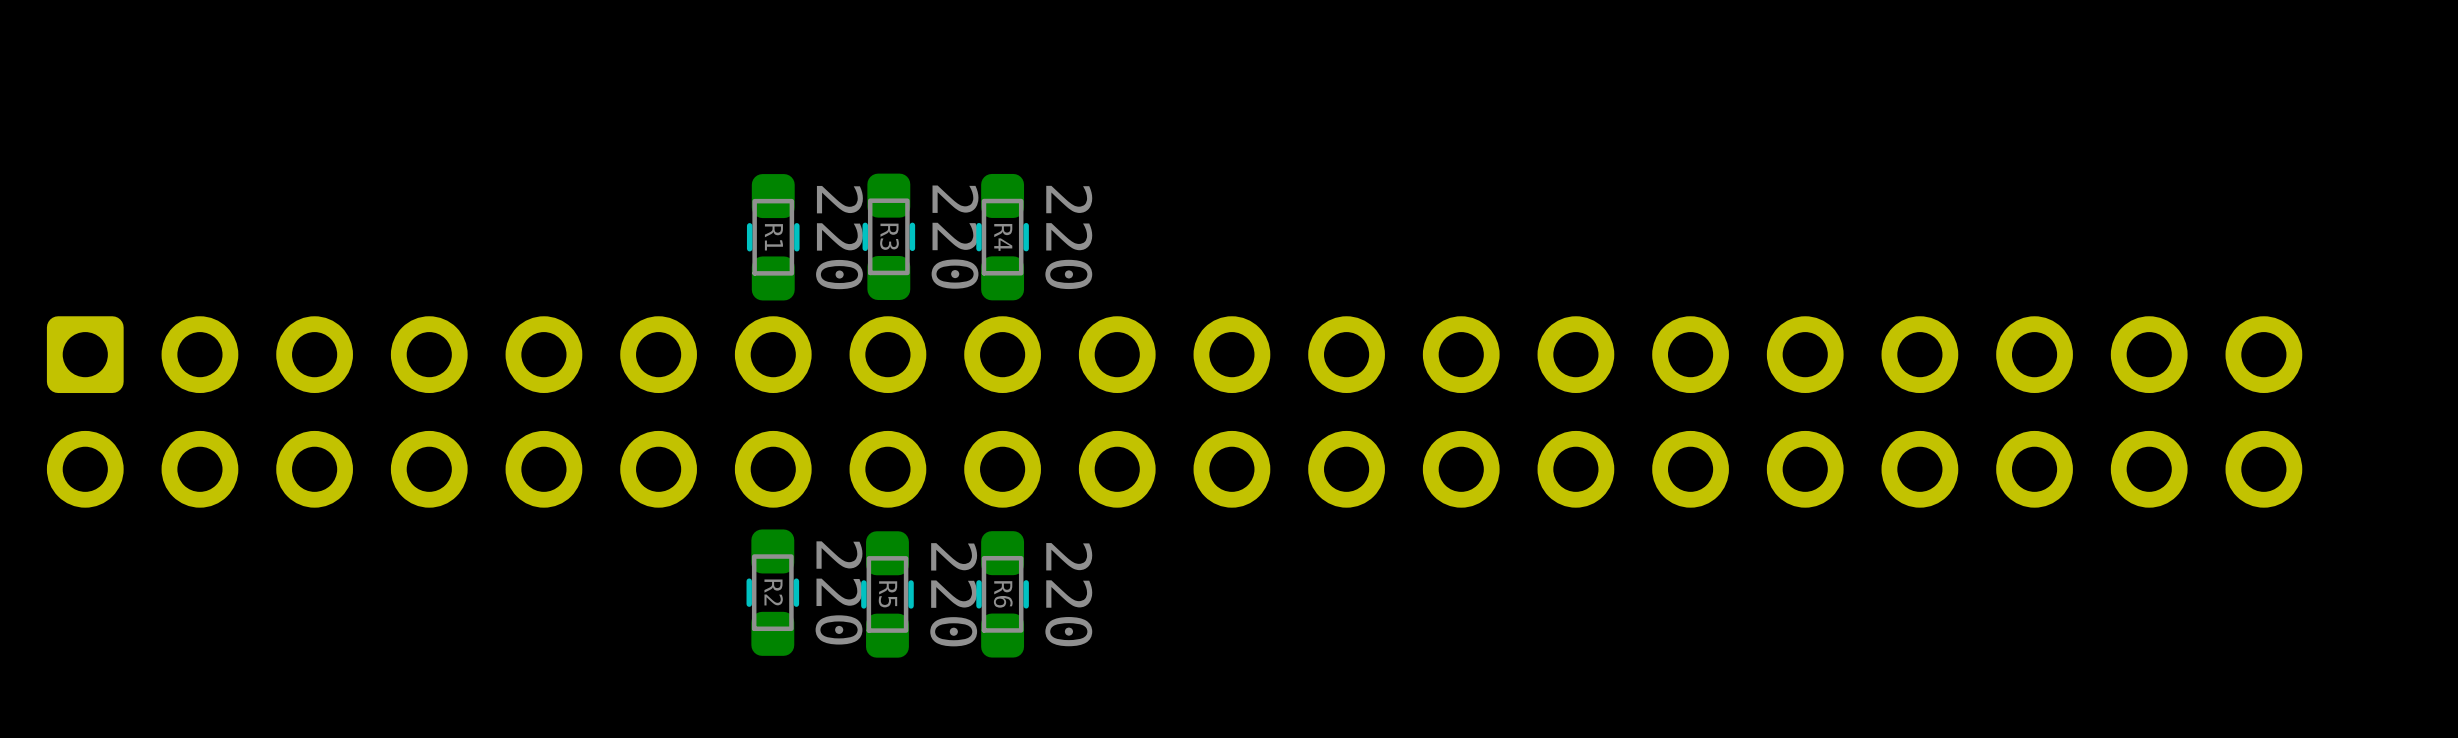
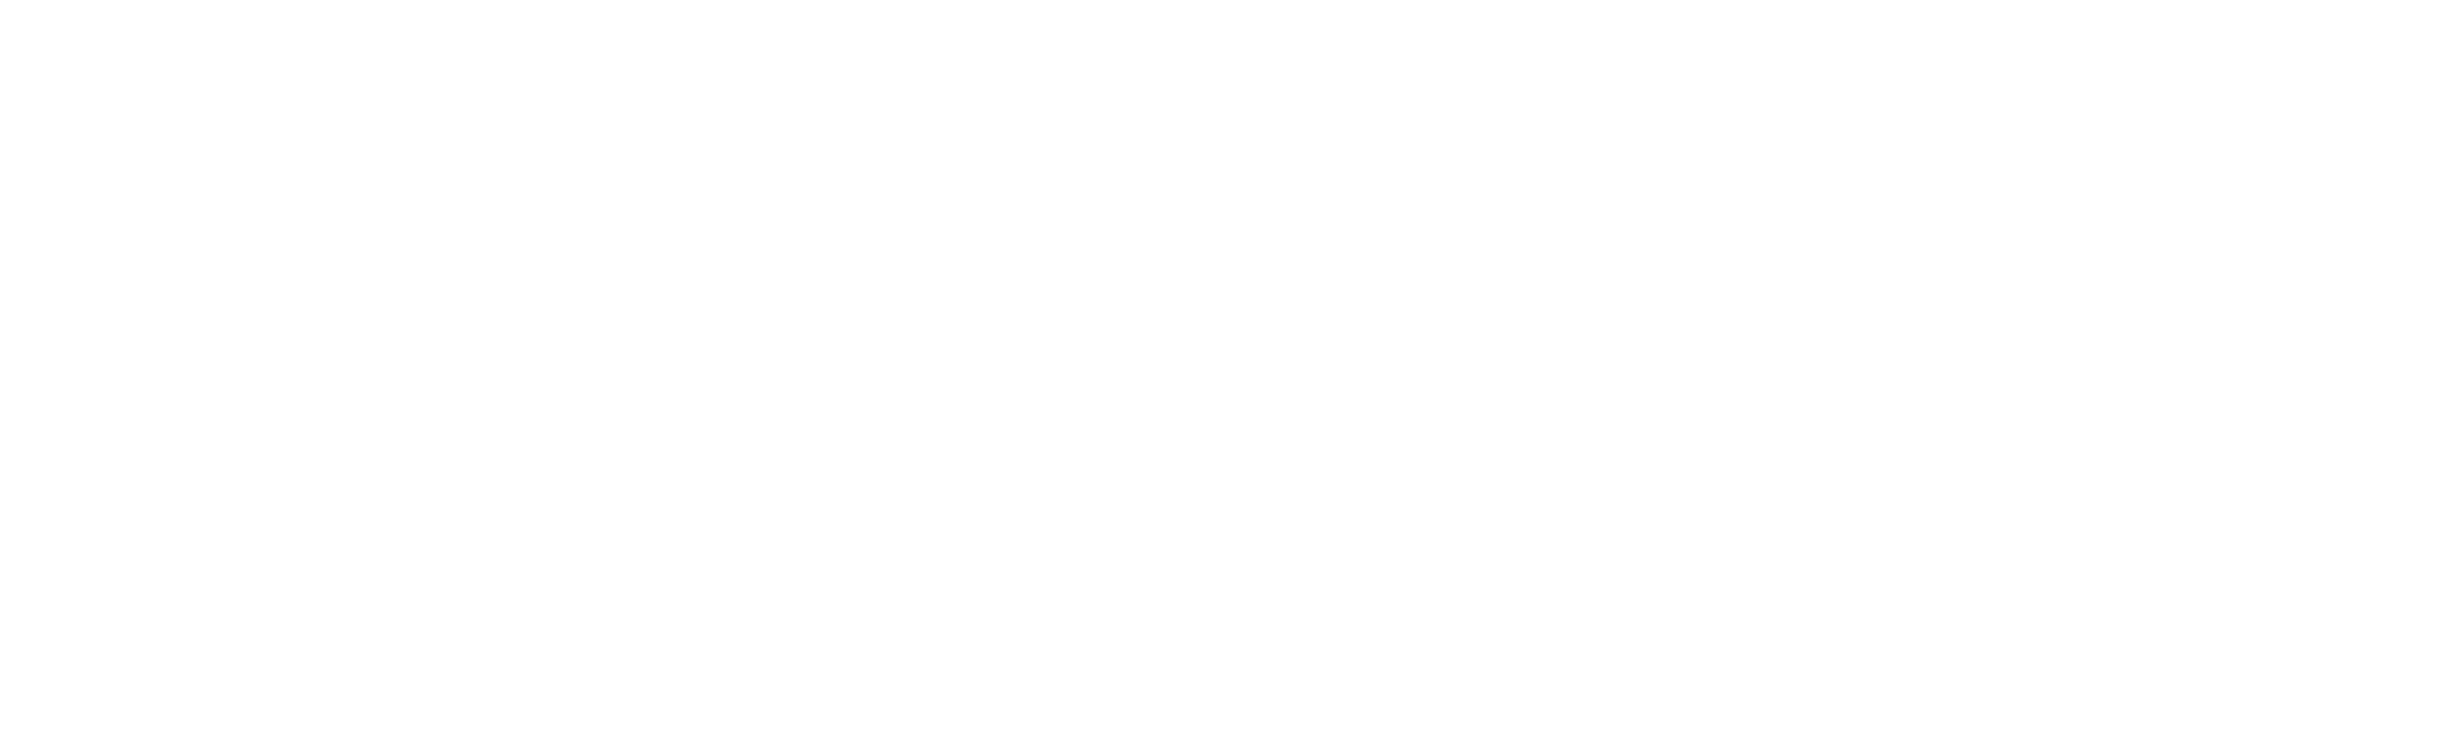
R3: 220 (888, 236) -> none
R1: 220 (773, 237) -> none
R4: 220 (1002, 237) -> none
part: (1174, 411) -> none
R2: 220 (772, 592) -> none
R5: 220 (887, 594) -> none
R6: 220 (1002, 594) -> none

